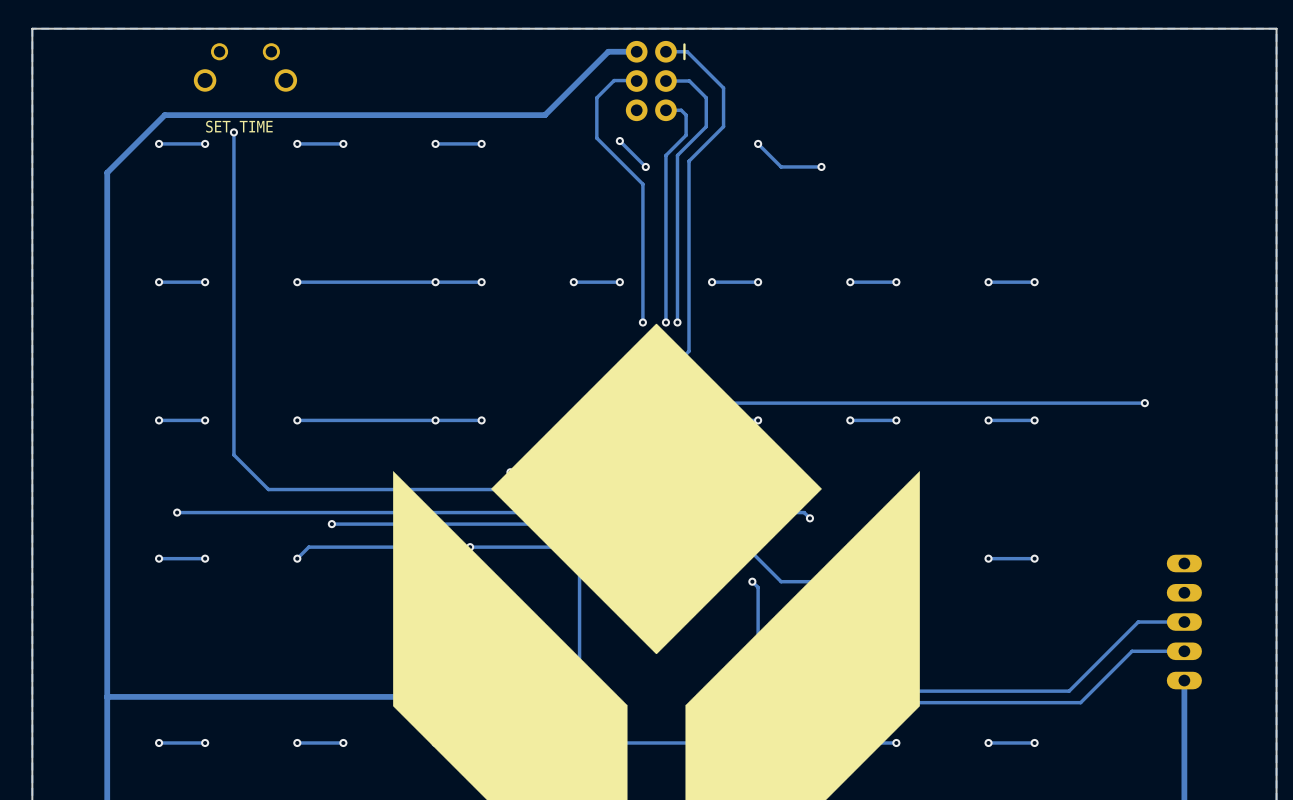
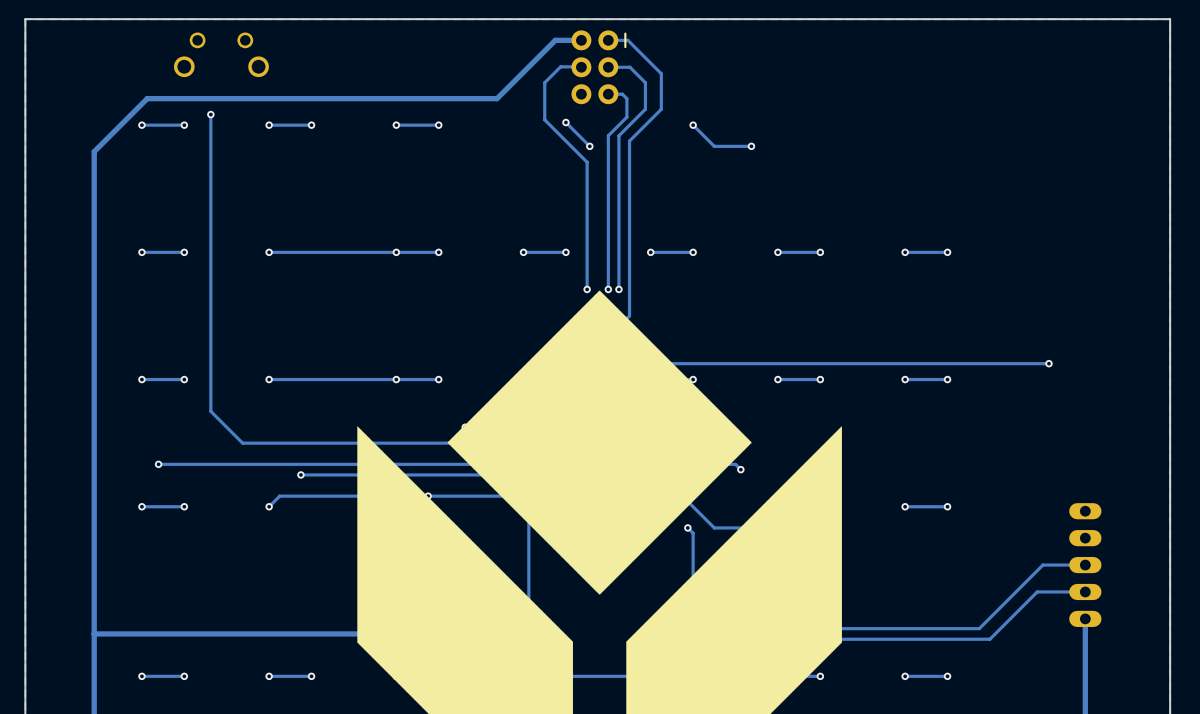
text: SET TIME (239, 126) -> none

